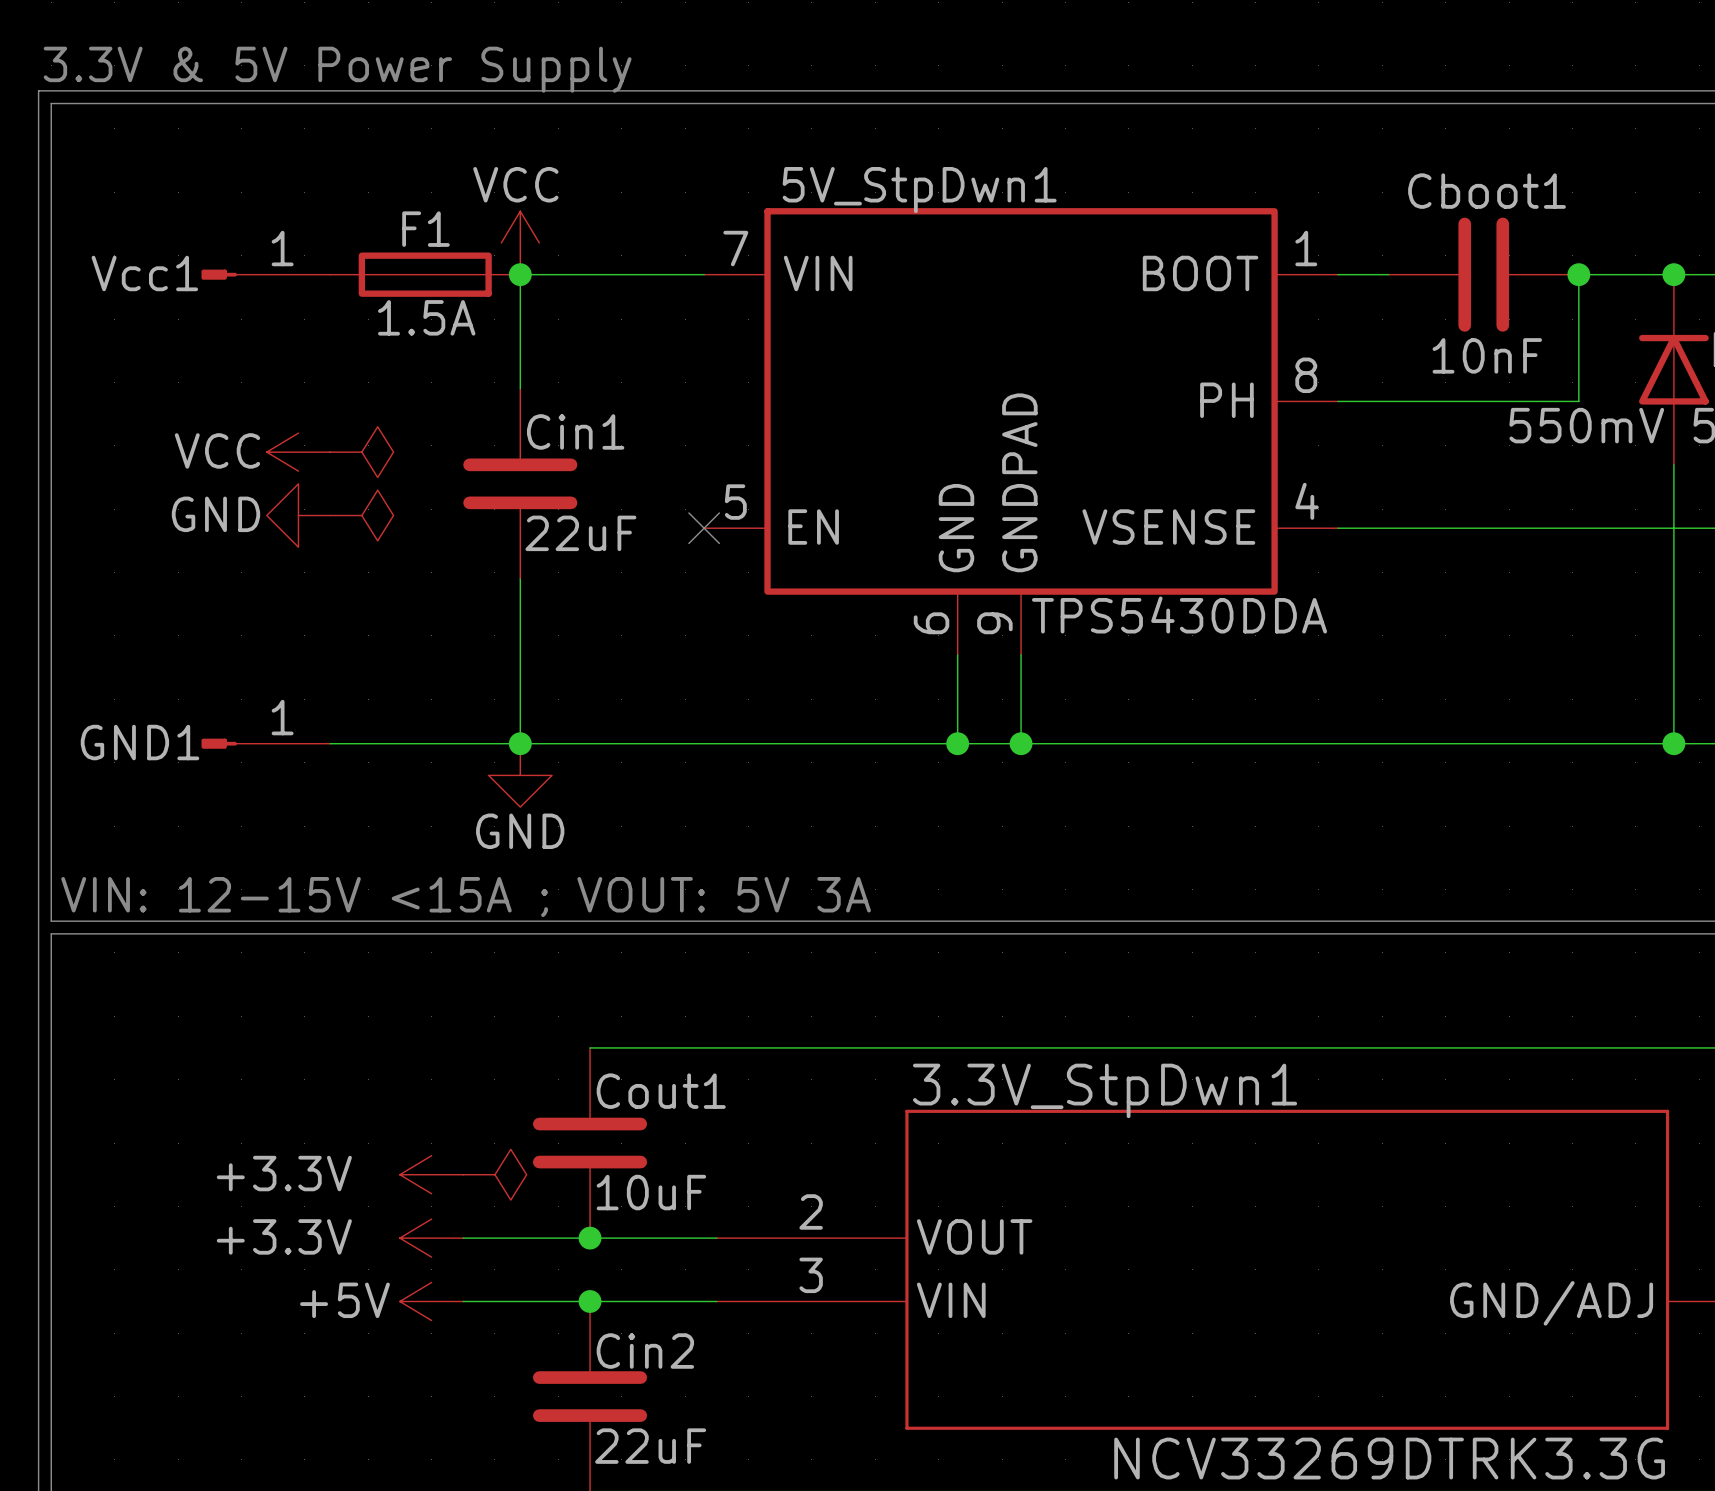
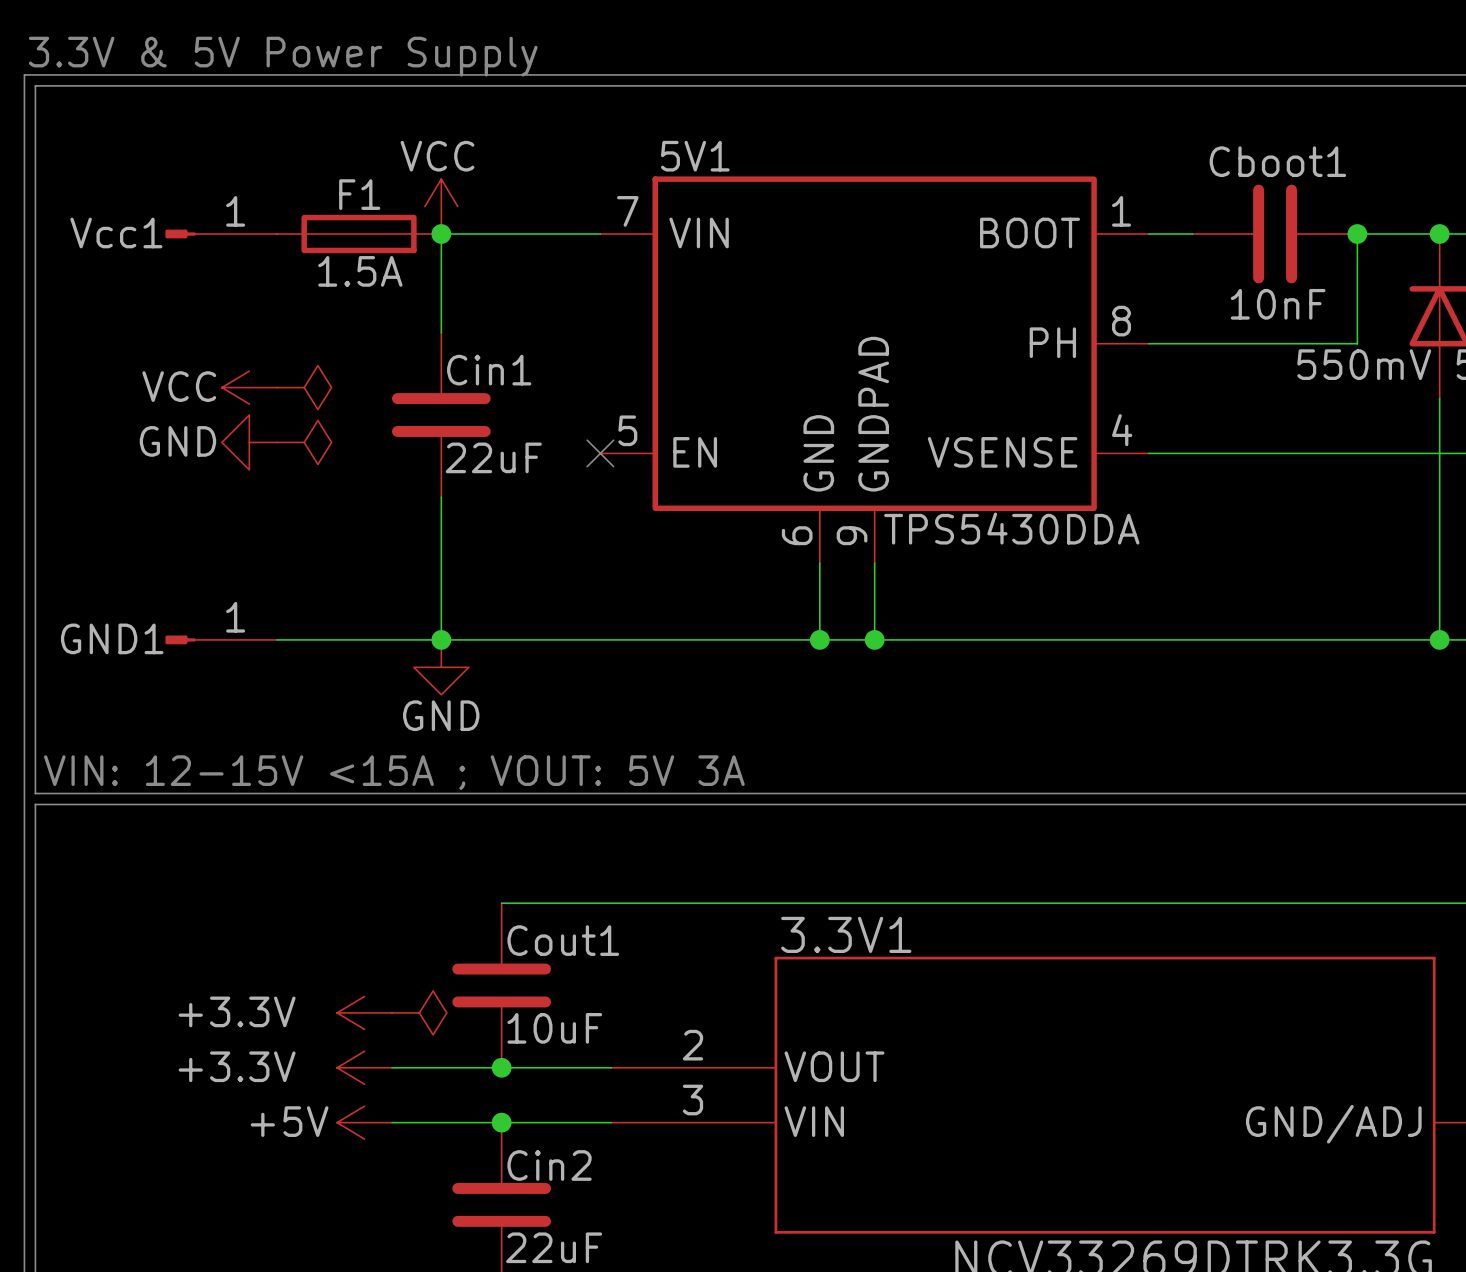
5V_StpDwn1 name: 5V_StpDwn1 (919, 190) -> 5V1 (695, 156)
3.3V_StpDwn1 name: 3.3V_StpDwn1 (1105, 1090) -> 3.3V1 (846, 934)

